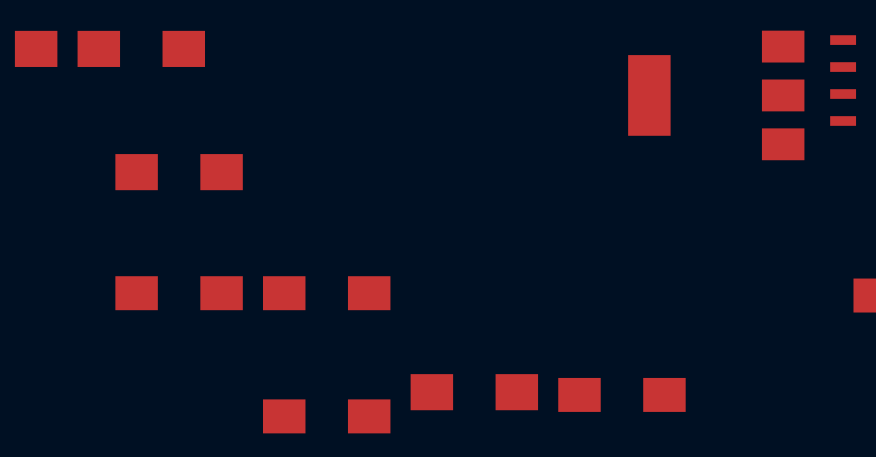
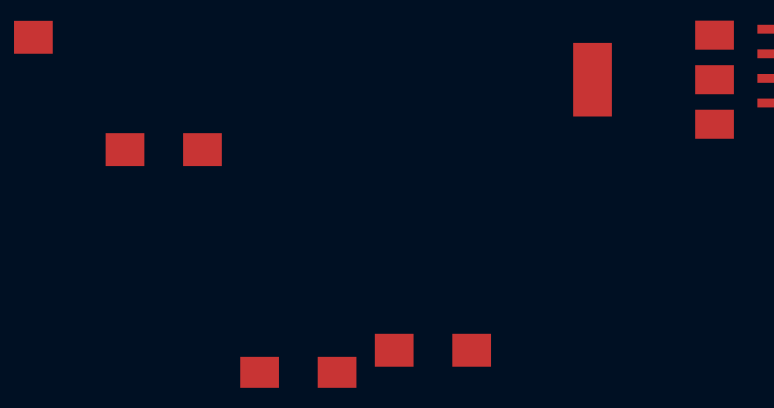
part: (141, 48) -> none
part: (179, 293) -> none
part: (326, 293) -> none
part: (621, 394) -> none

